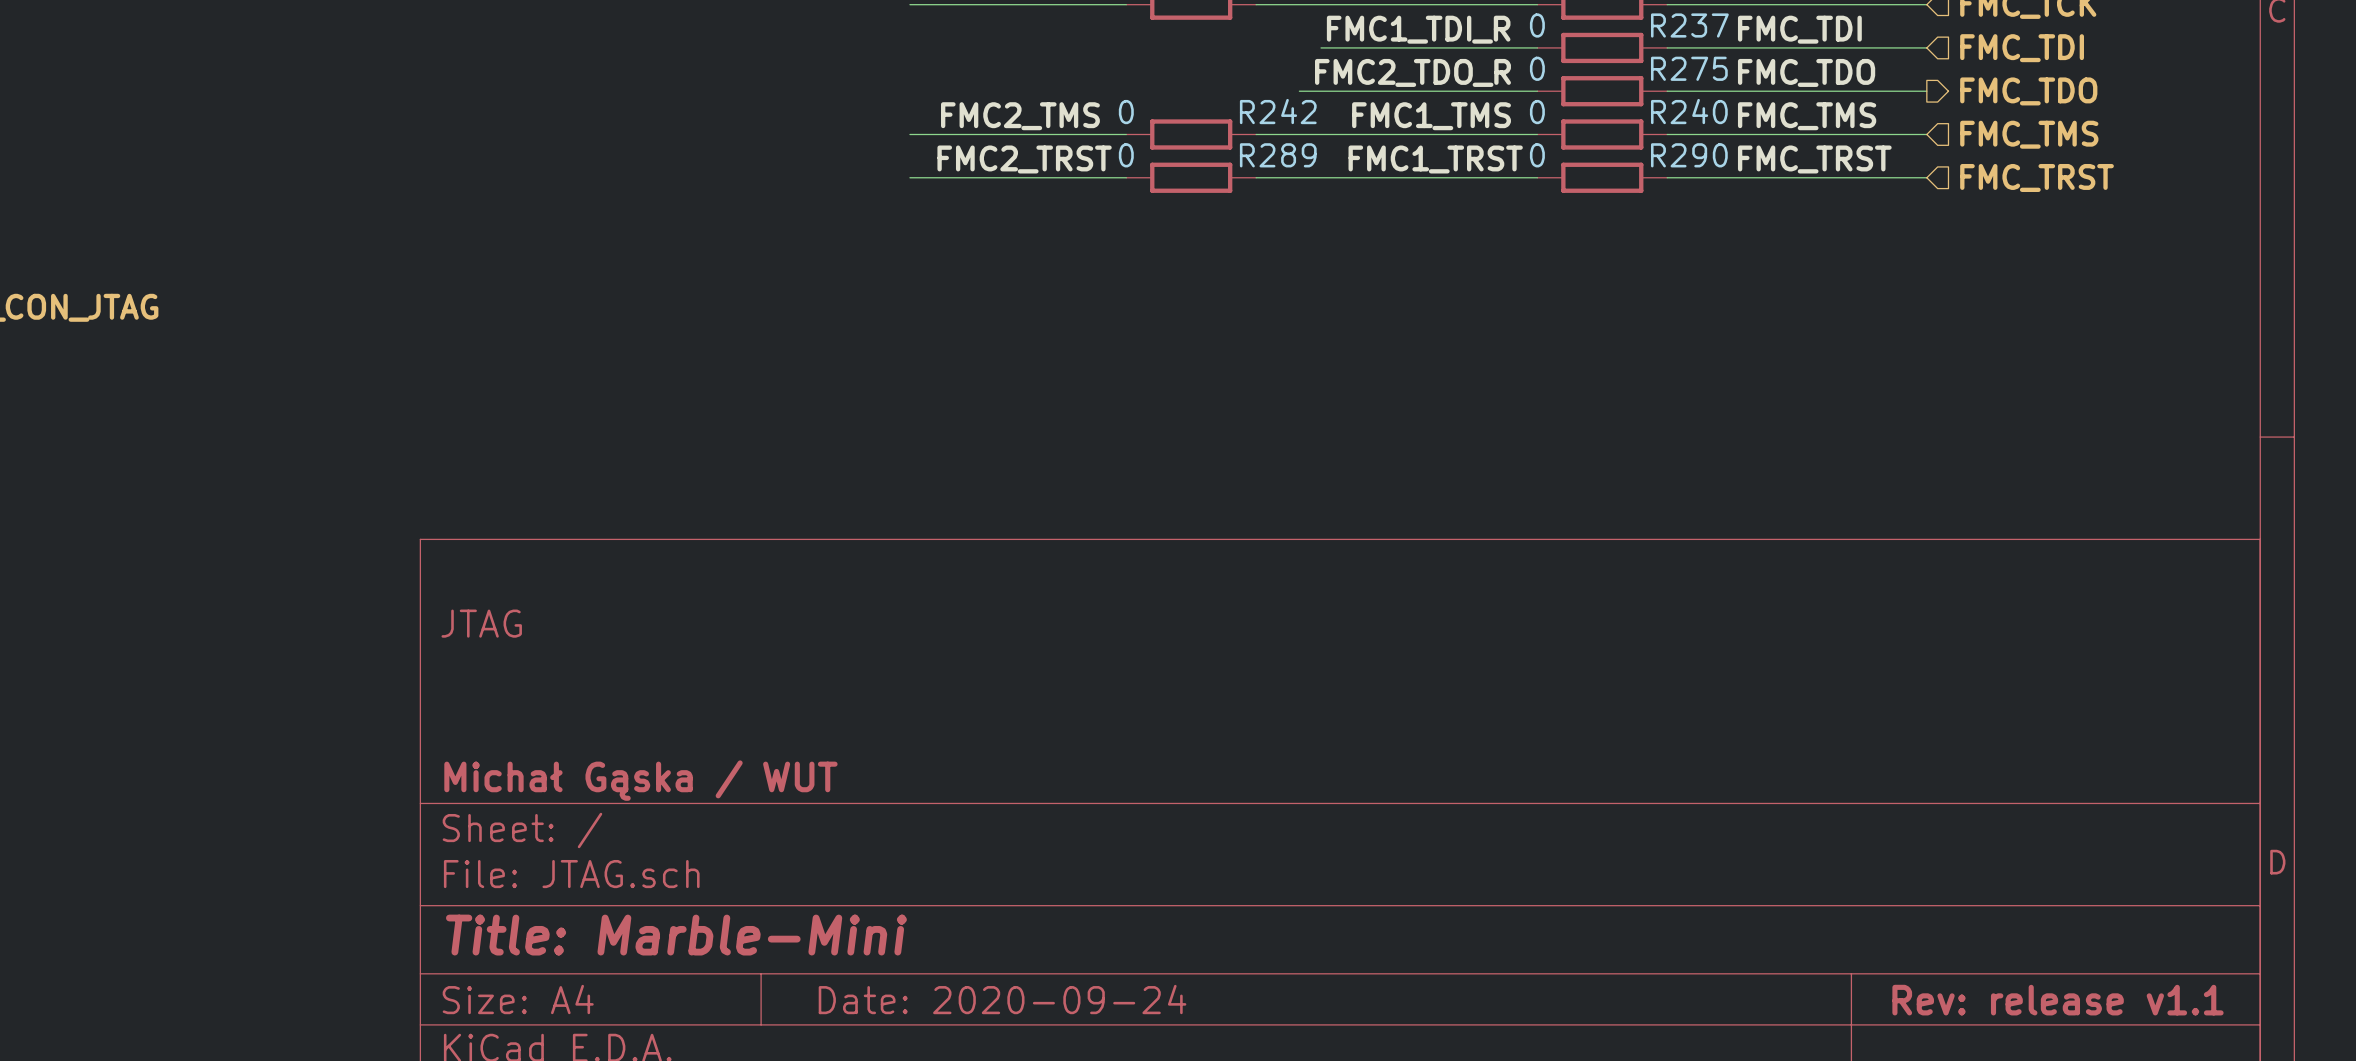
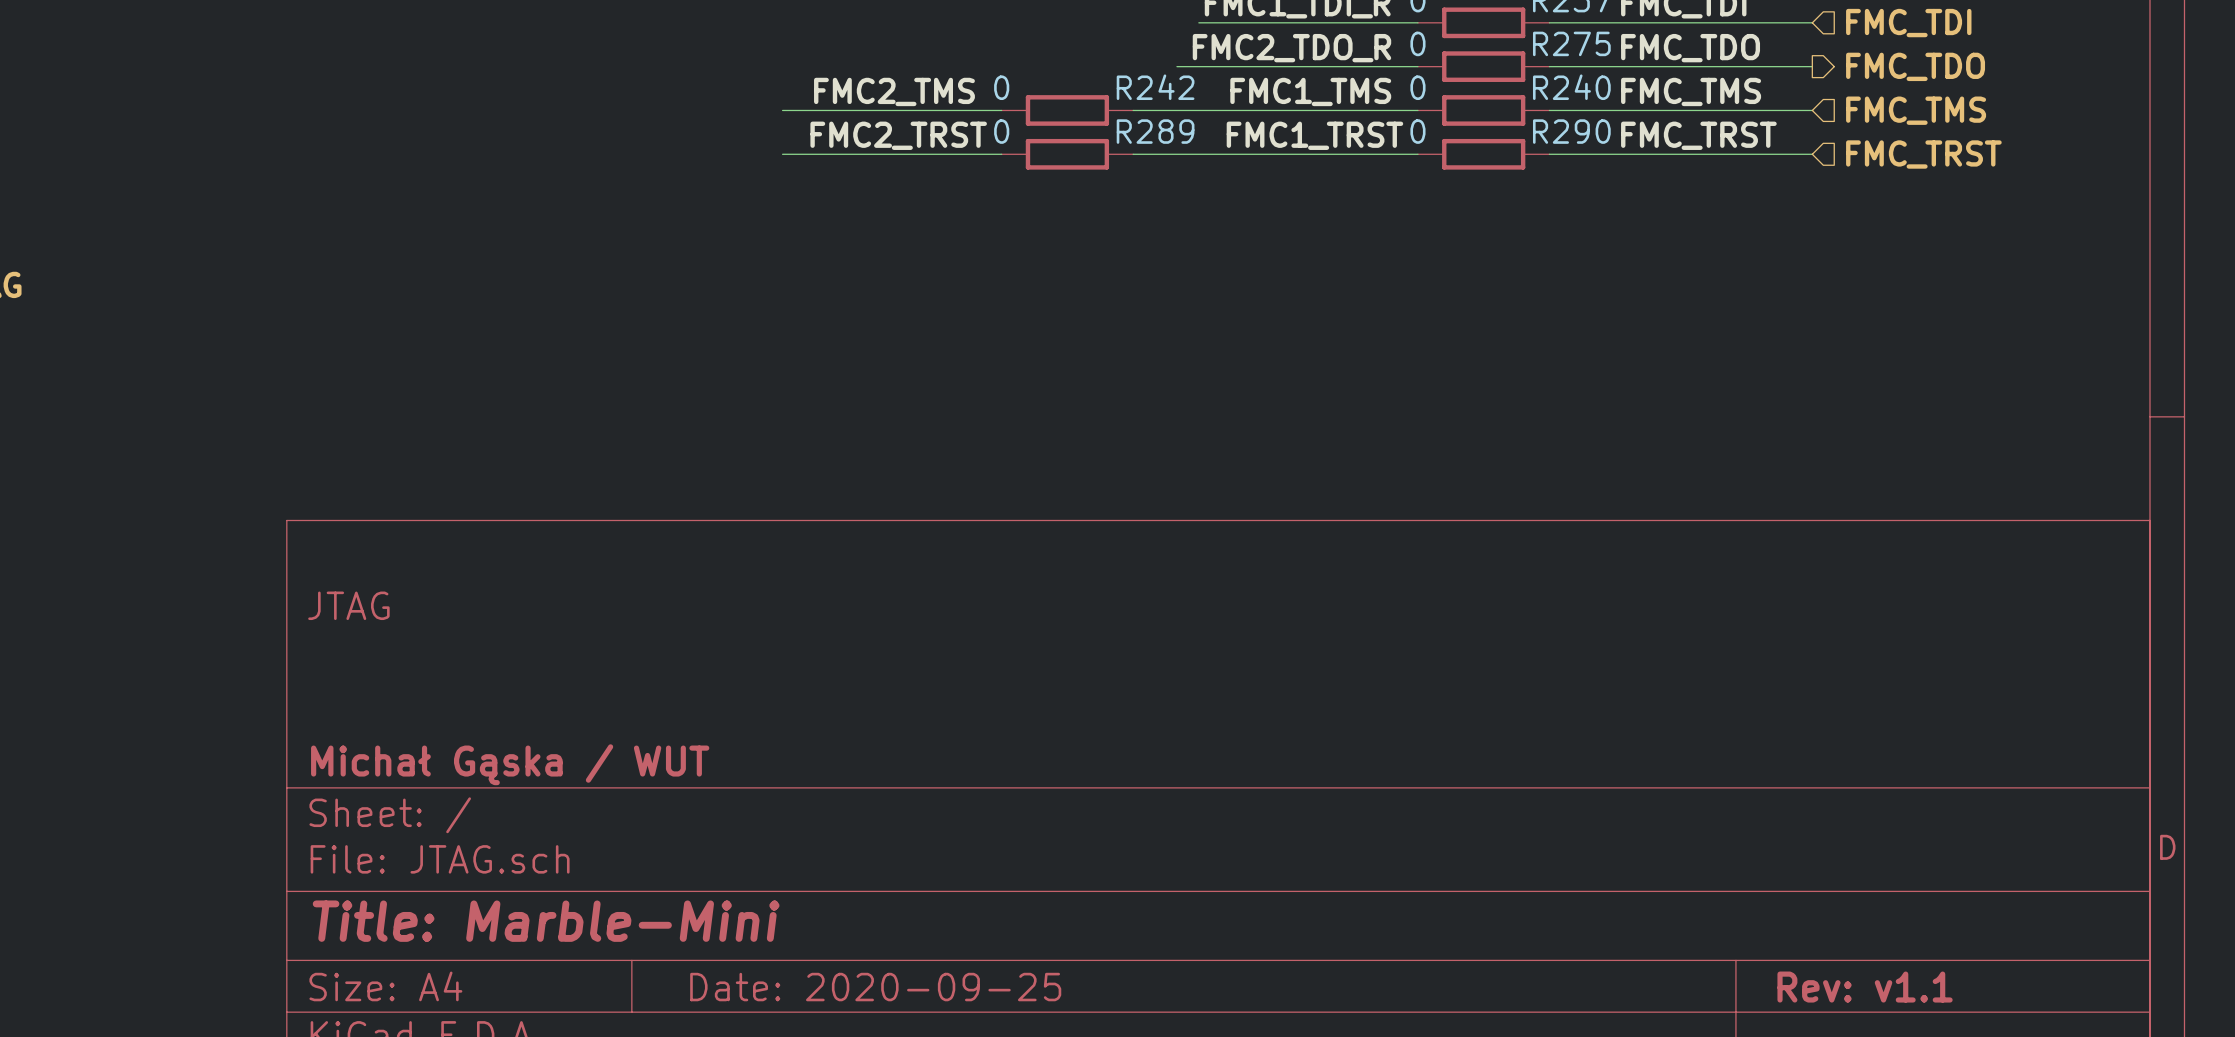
title block: Date: 2020-09-24 (1002, 999) -> Date: 2020-09-25 (875, 987)
title block: Rev: release v1.1 (2057, 1000) -> Rev: v1.1 (1865, 987)

